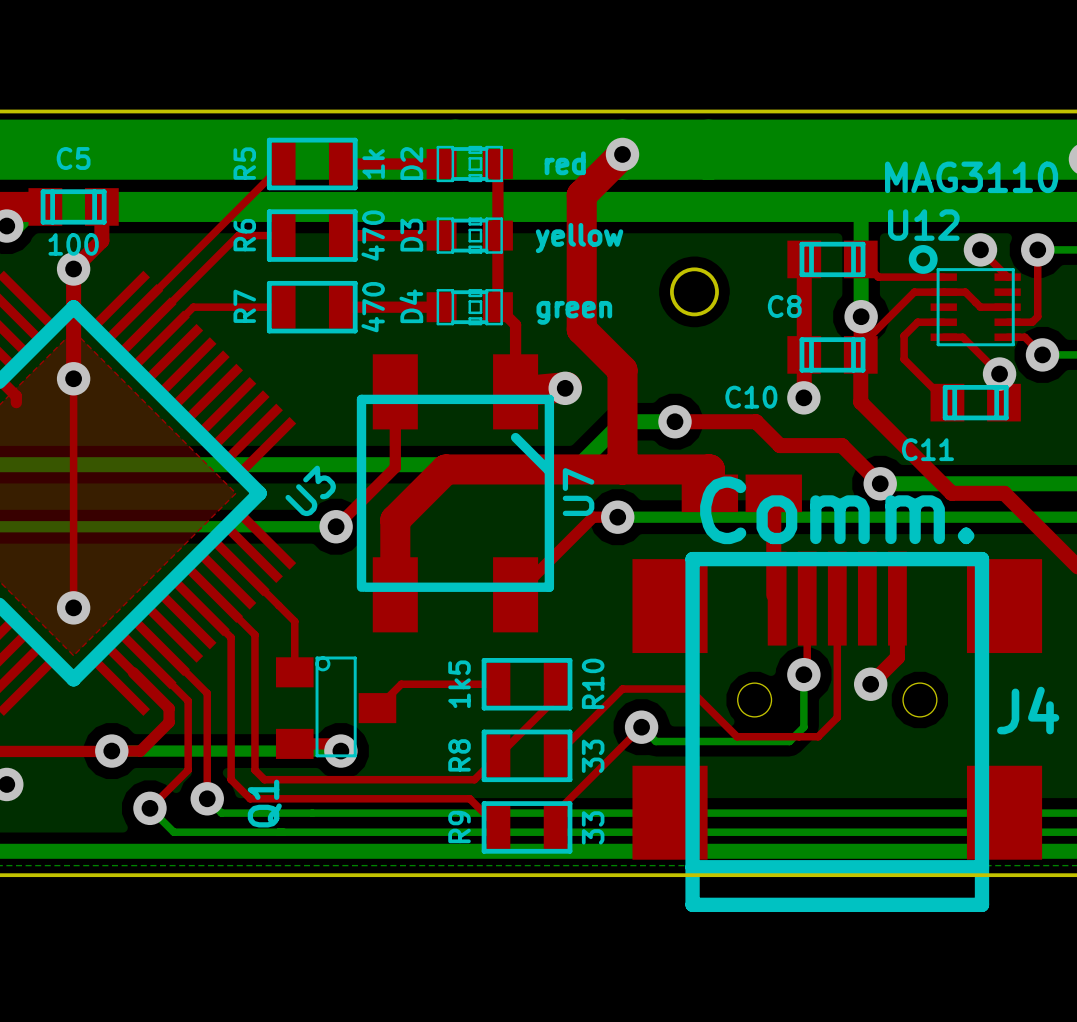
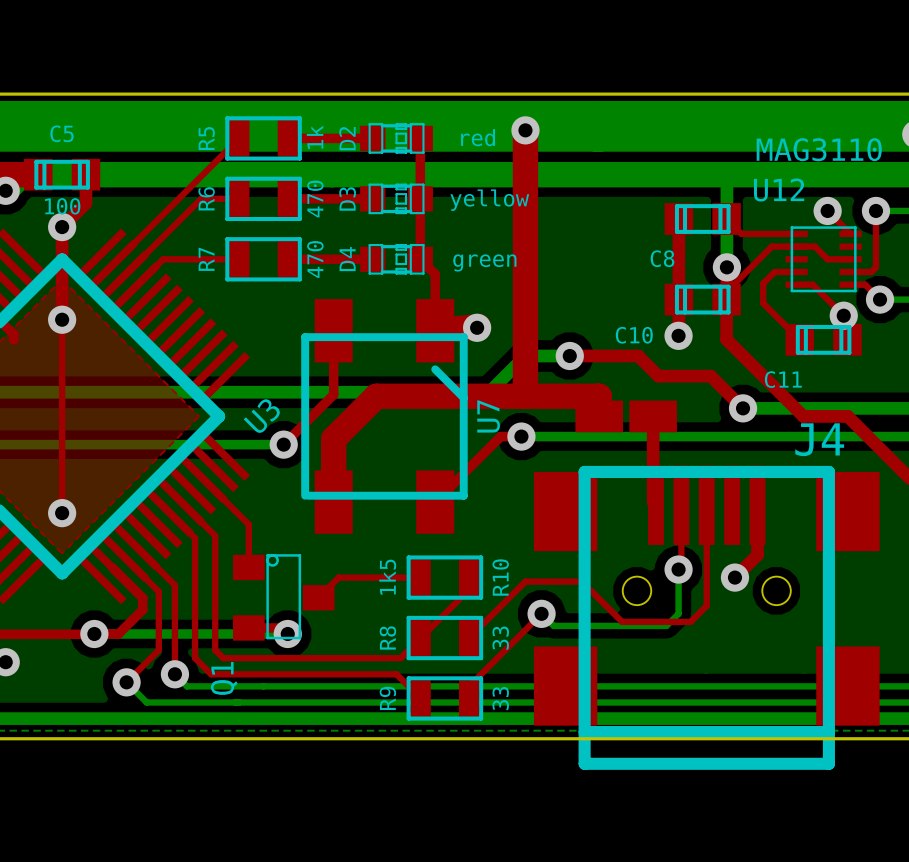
top track: (622, 154) (581, 195) (581, 329) (622, 370) -> (525, 130) (525, 312)
drawing: [908, 245, 938, 274] -> none
round board edge: [670, 267, 719, 317] -> none
text: Comm. (837, 510) -> none
J4 name position: J4 (1028, 710) -> J4 (819, 439)

